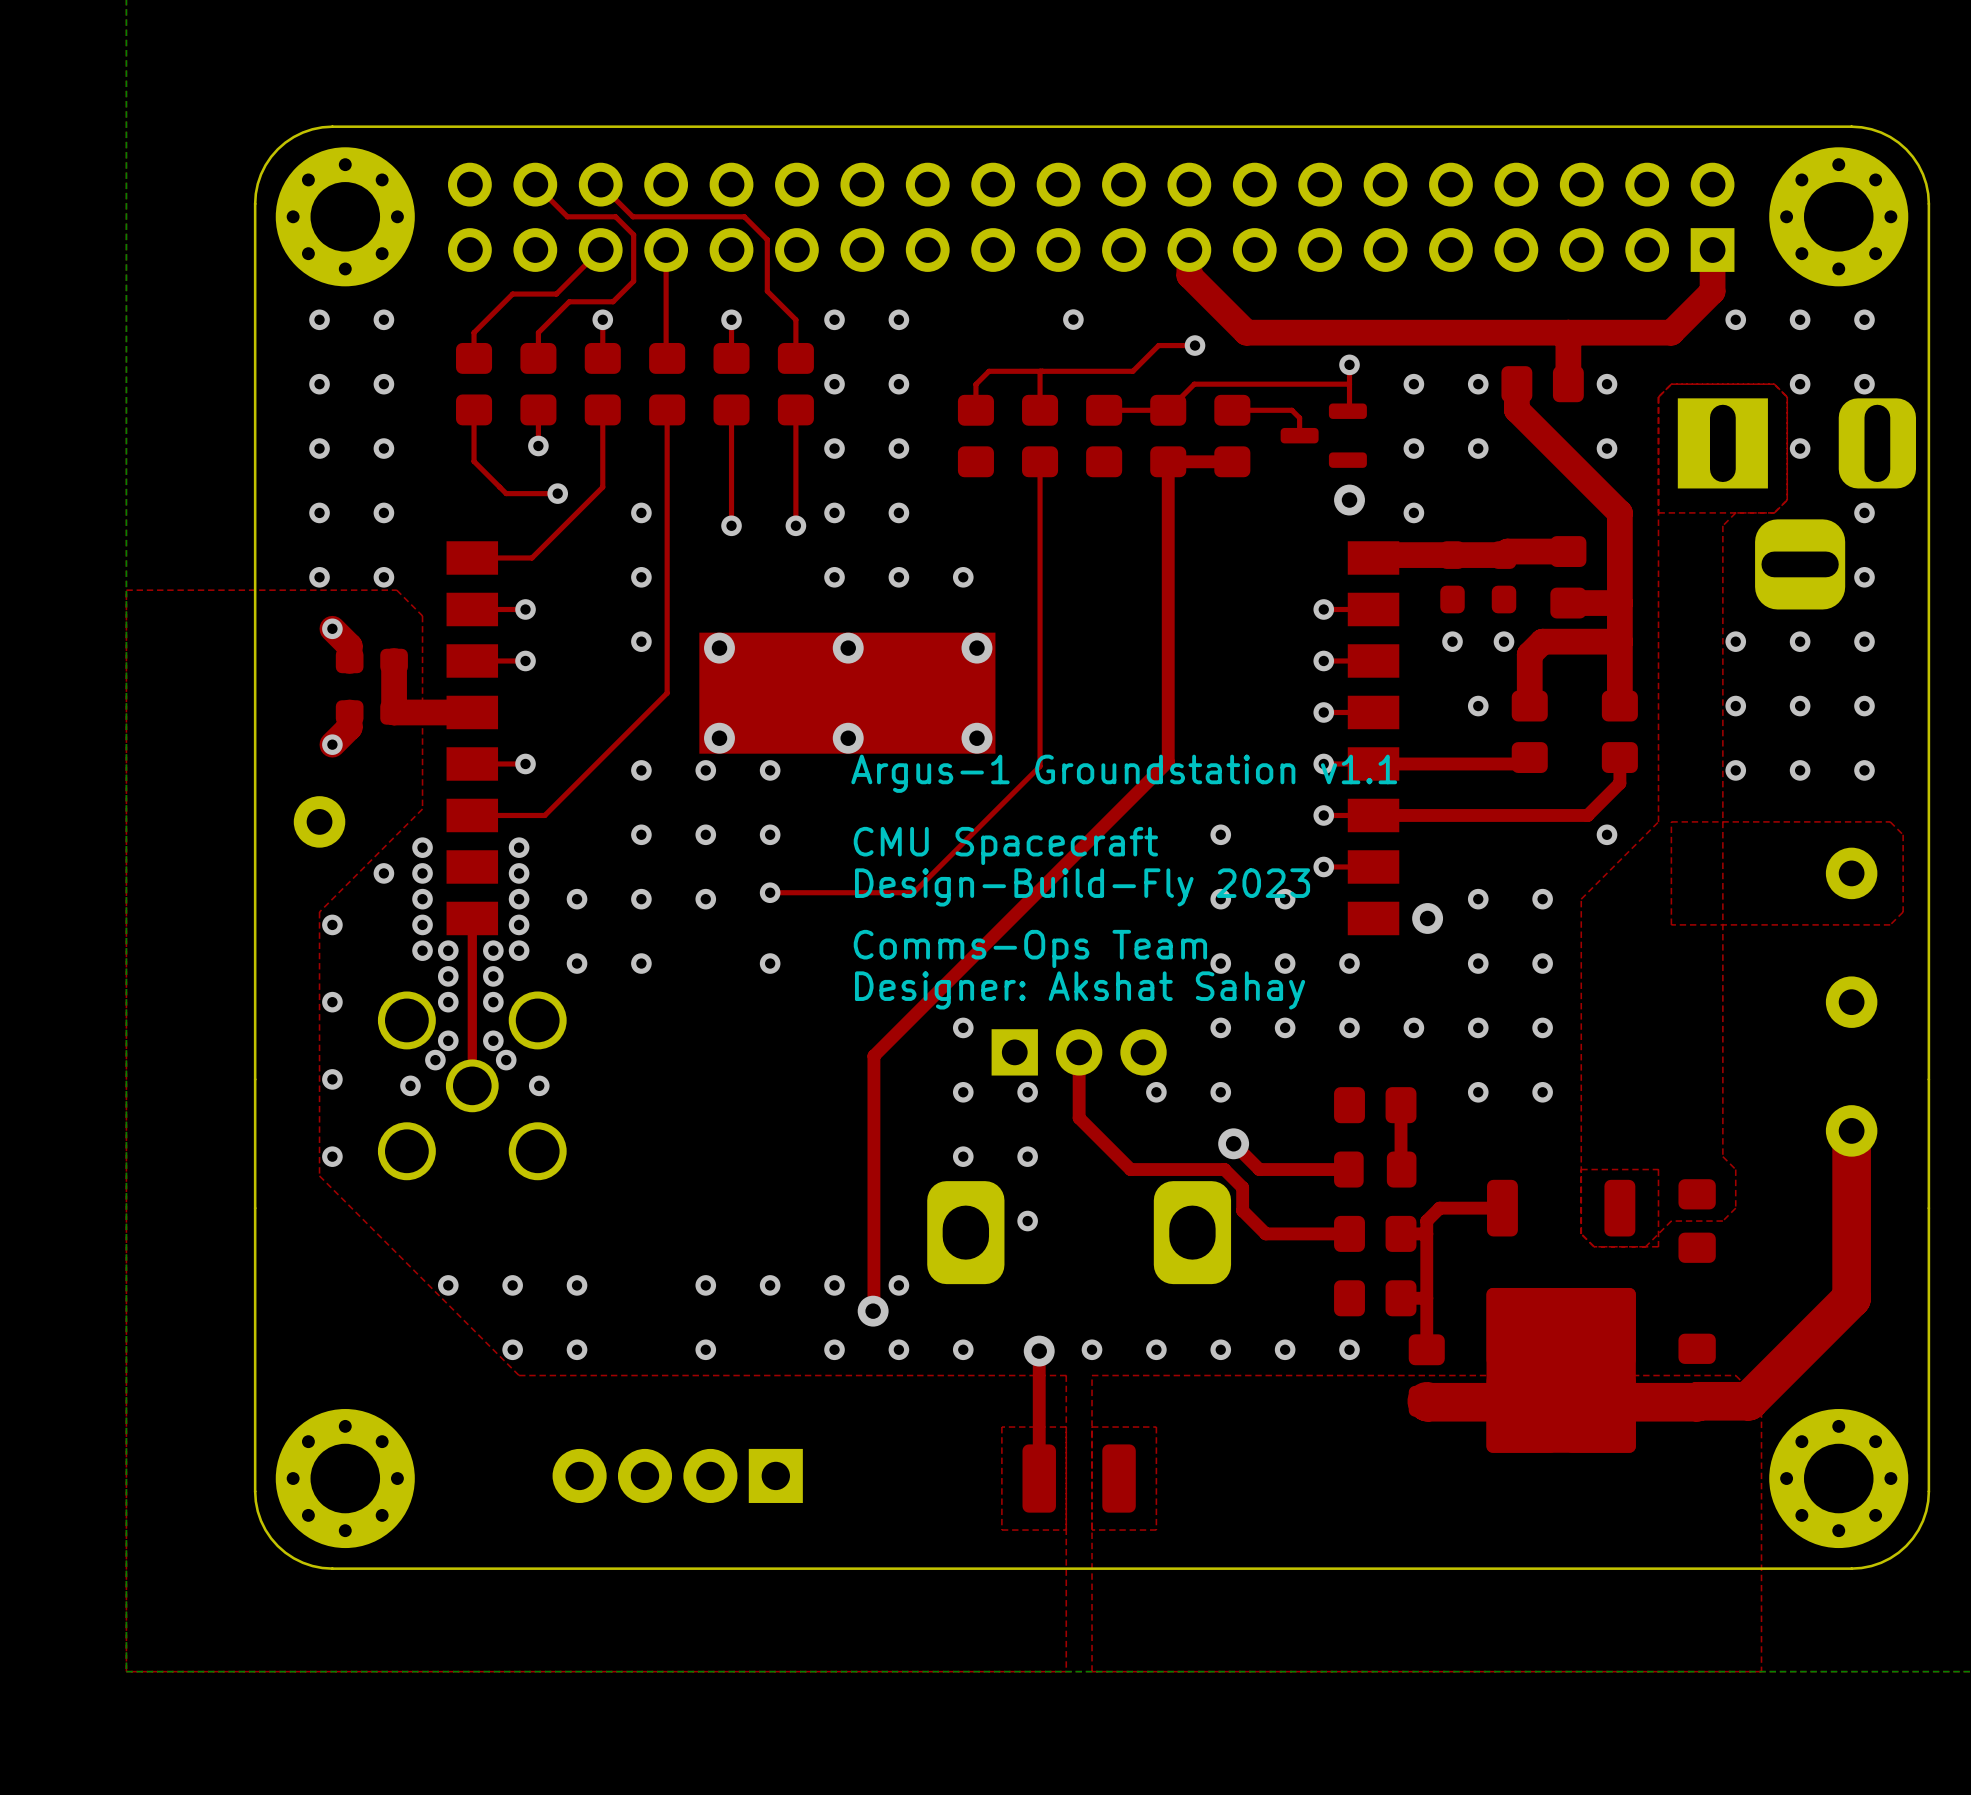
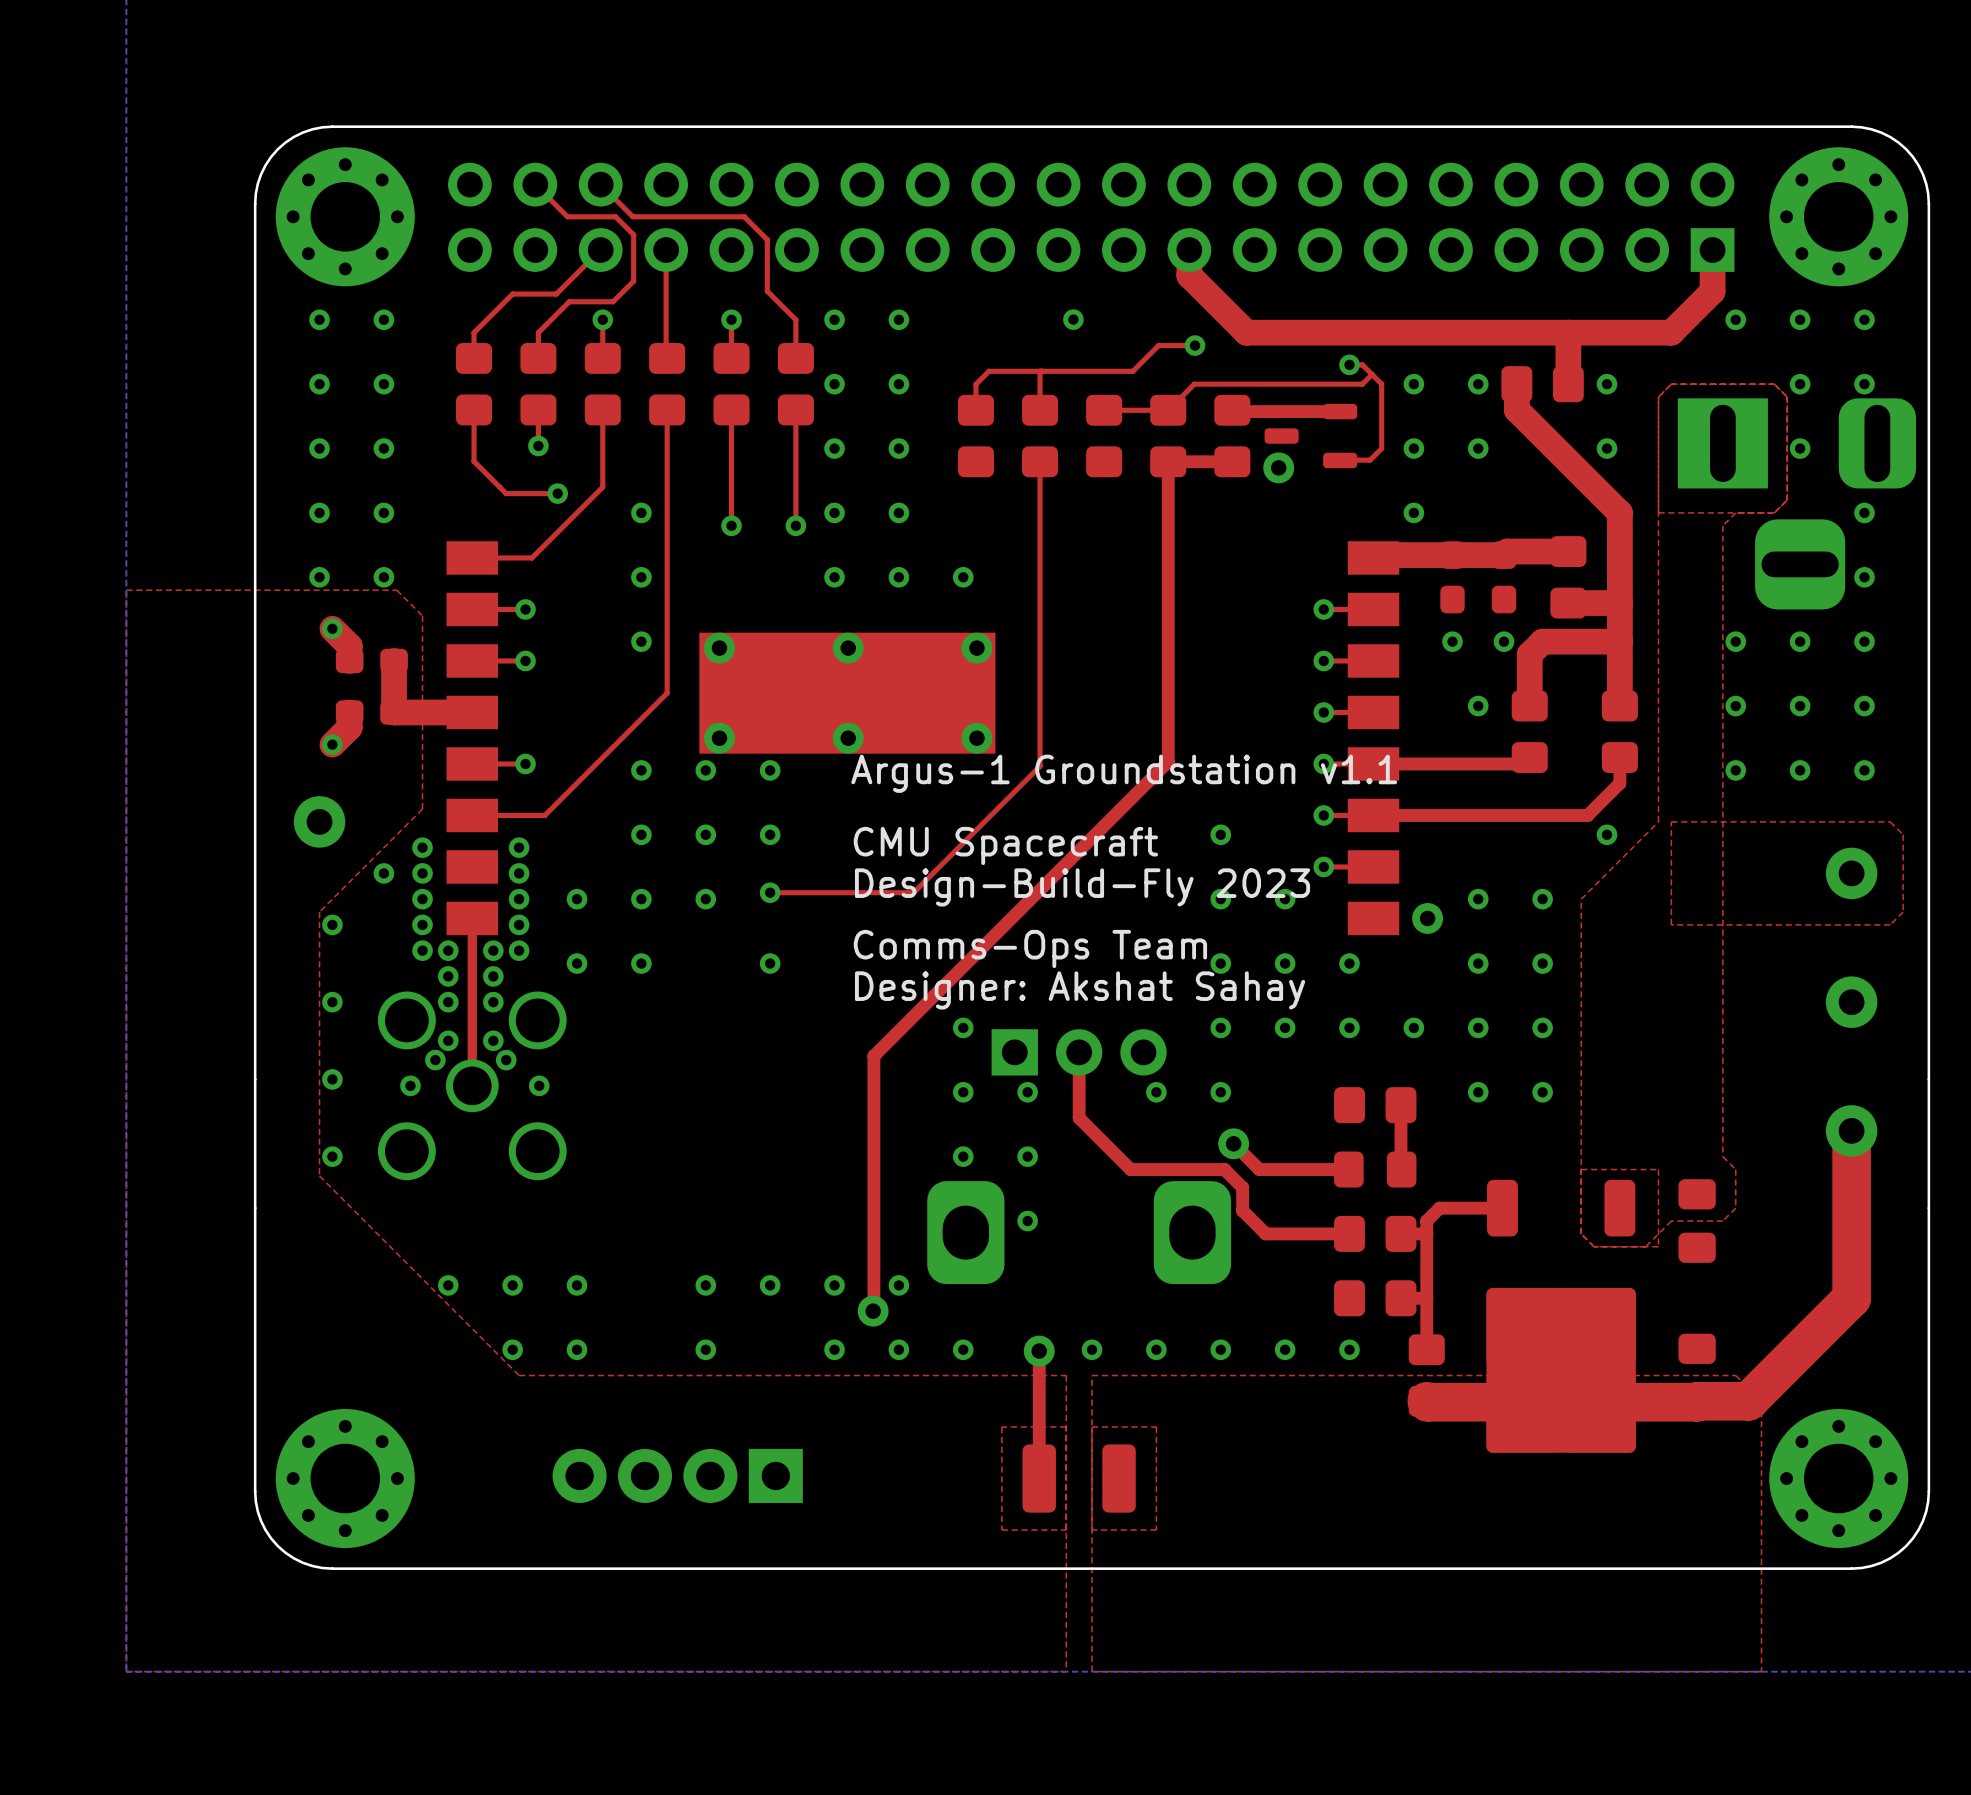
top track: (1349, 364) (1349, 409) (1347, 411) -> (1349, 364) (1362, 364) (1381, 384) (1381, 448) (1370, 460) (1340, 460)
top track: none -> (1372, 374) (1362, 384) (1349, 384)
part footprint: [1280, 403, 1367, 468] -> [1264, 403, 1358, 469]
top track: (1232, 410) (1291, 410) (1299, 417) (1299, 435) -> none
top track: none -> (1340, 411) (1233, 411)
via position: (1349, 500) -> (1278, 467)

